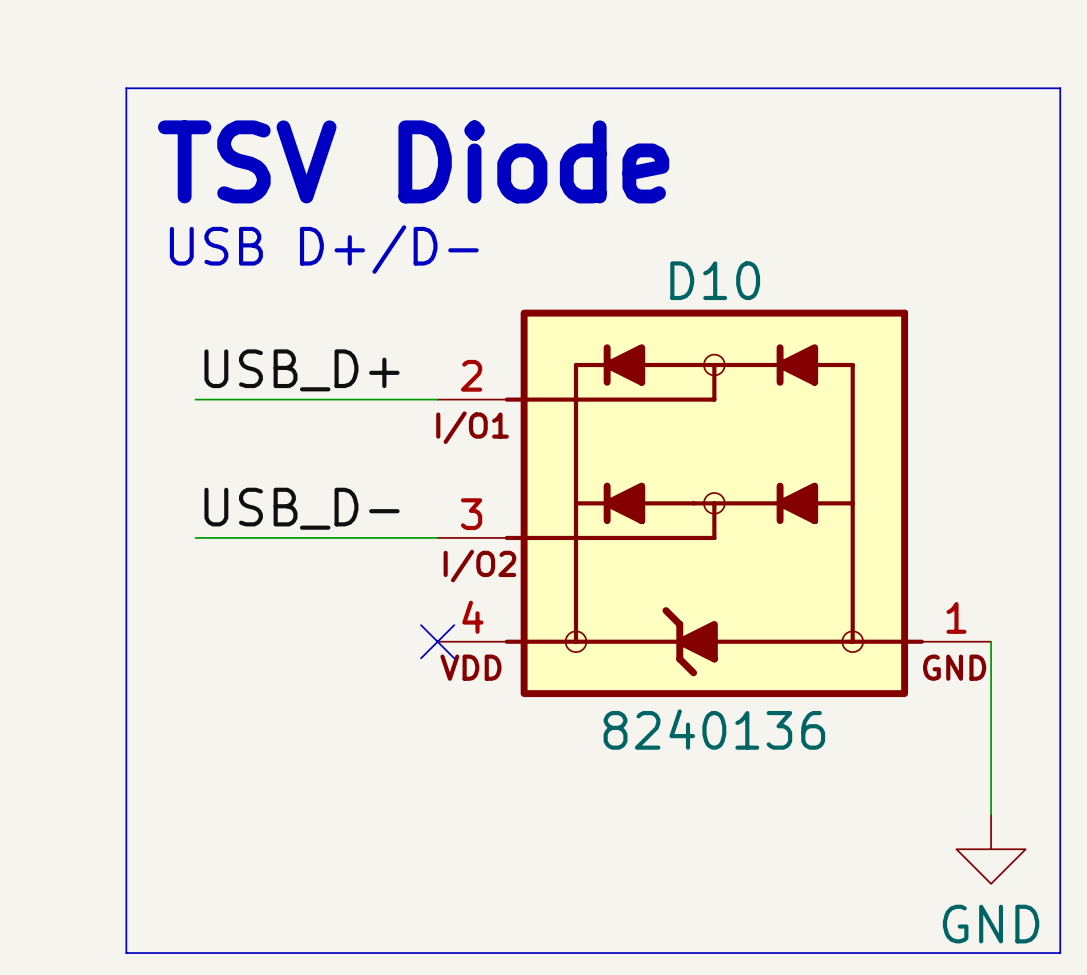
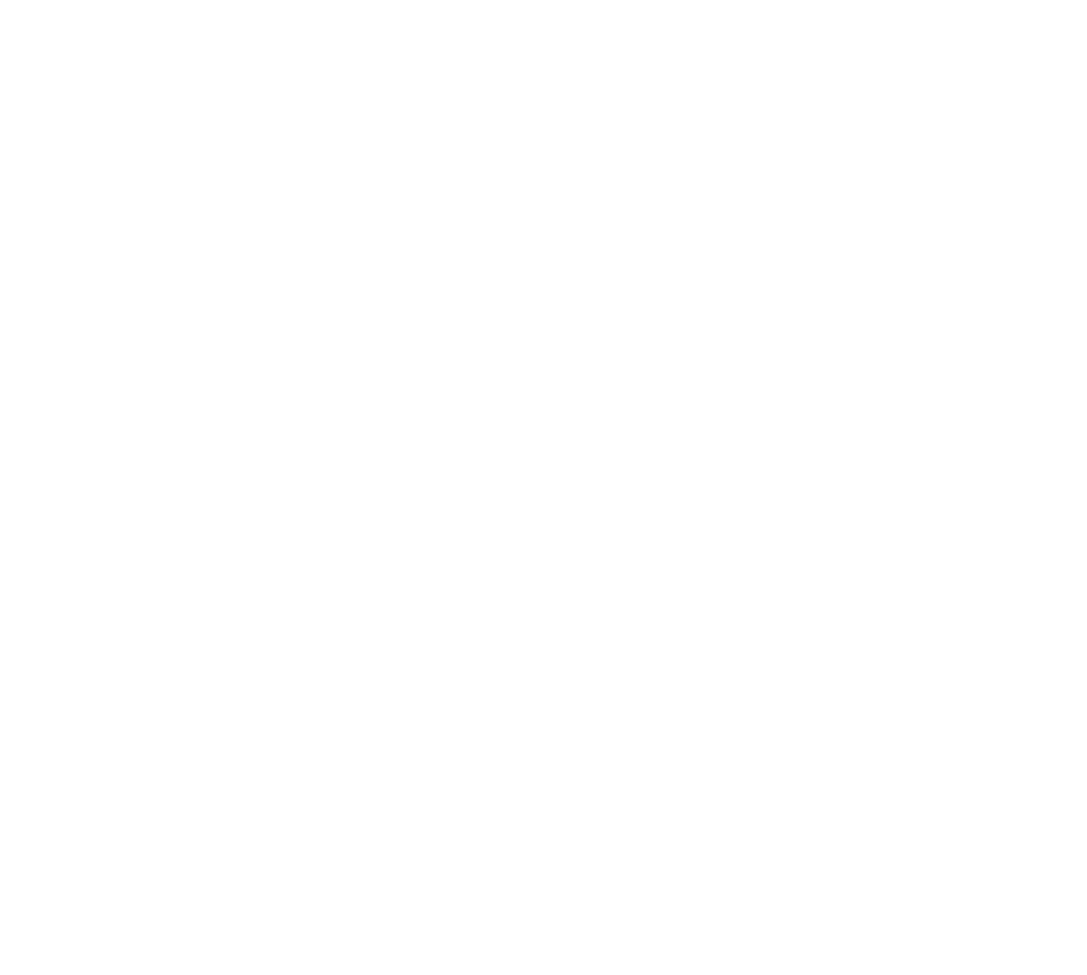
line: (126, 88) (1060, 88) (1060, 953) (126, 953) (126, 88) -> none
text: TSV Diode (413, 161) -> none
text: USB D+/D- (324, 249) -> none
label: USB_D+ (302, 370) -> none
wire: (195, 399) (437, 399) -> none
D10: 8240136 (714, 503) -> none
label: USB_D- (302, 508) -> none
wire: (195, 537) (437, 537) -> none
no-connect mark: (437, 641) -> none
wire: (991, 641) (991, 814) -> none
power symbol: GND (991, 849) -> none

